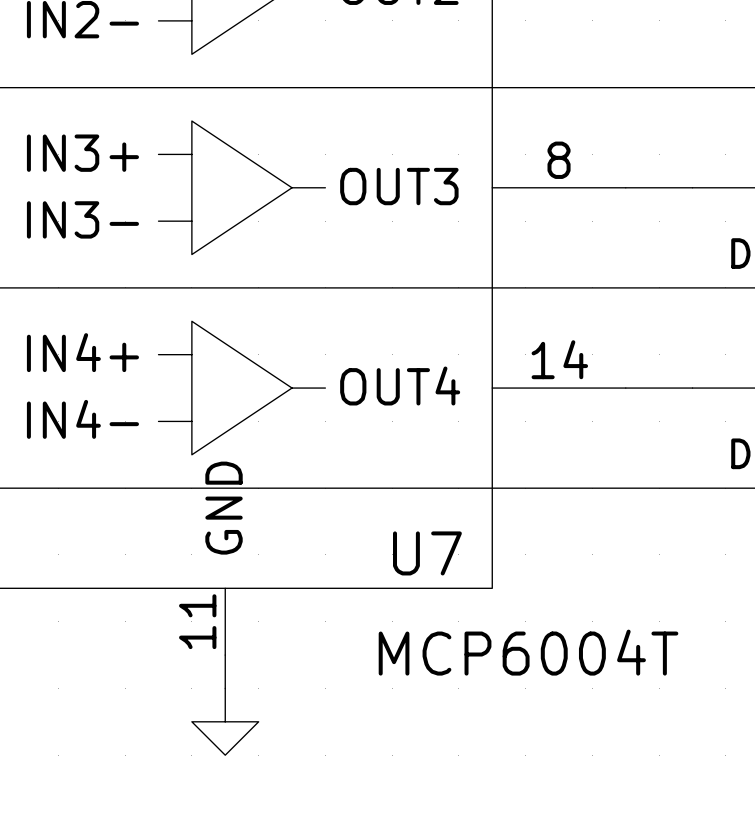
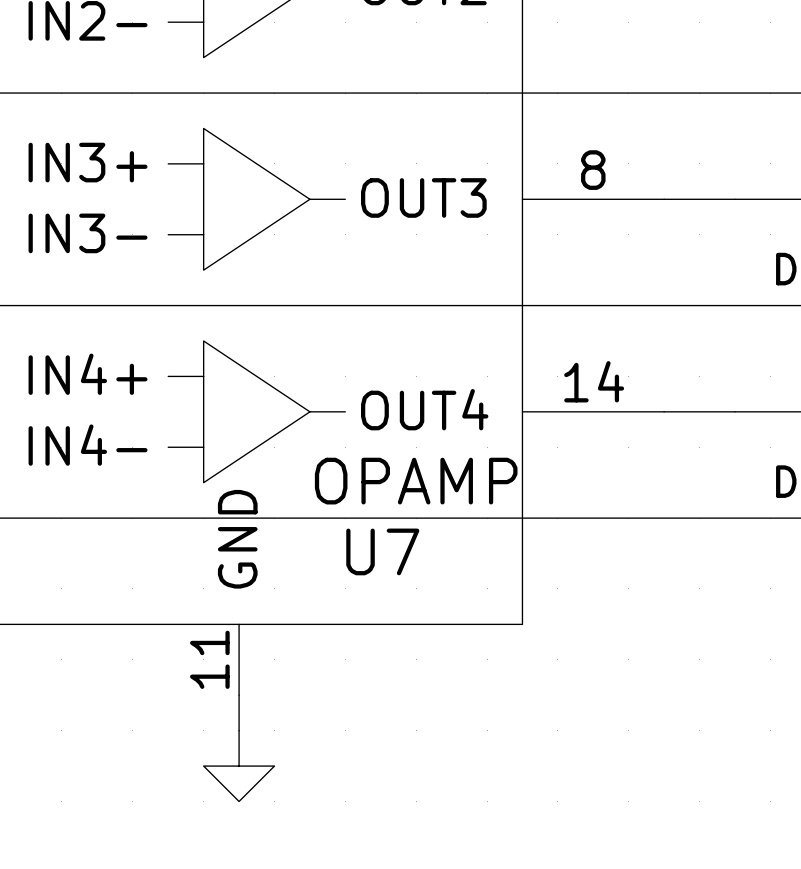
U7 name position: U7 (427, 553) -> U7 (382, 551)
U7 value: MCP6004T (528, 652) -> OPAMP (416, 481)

